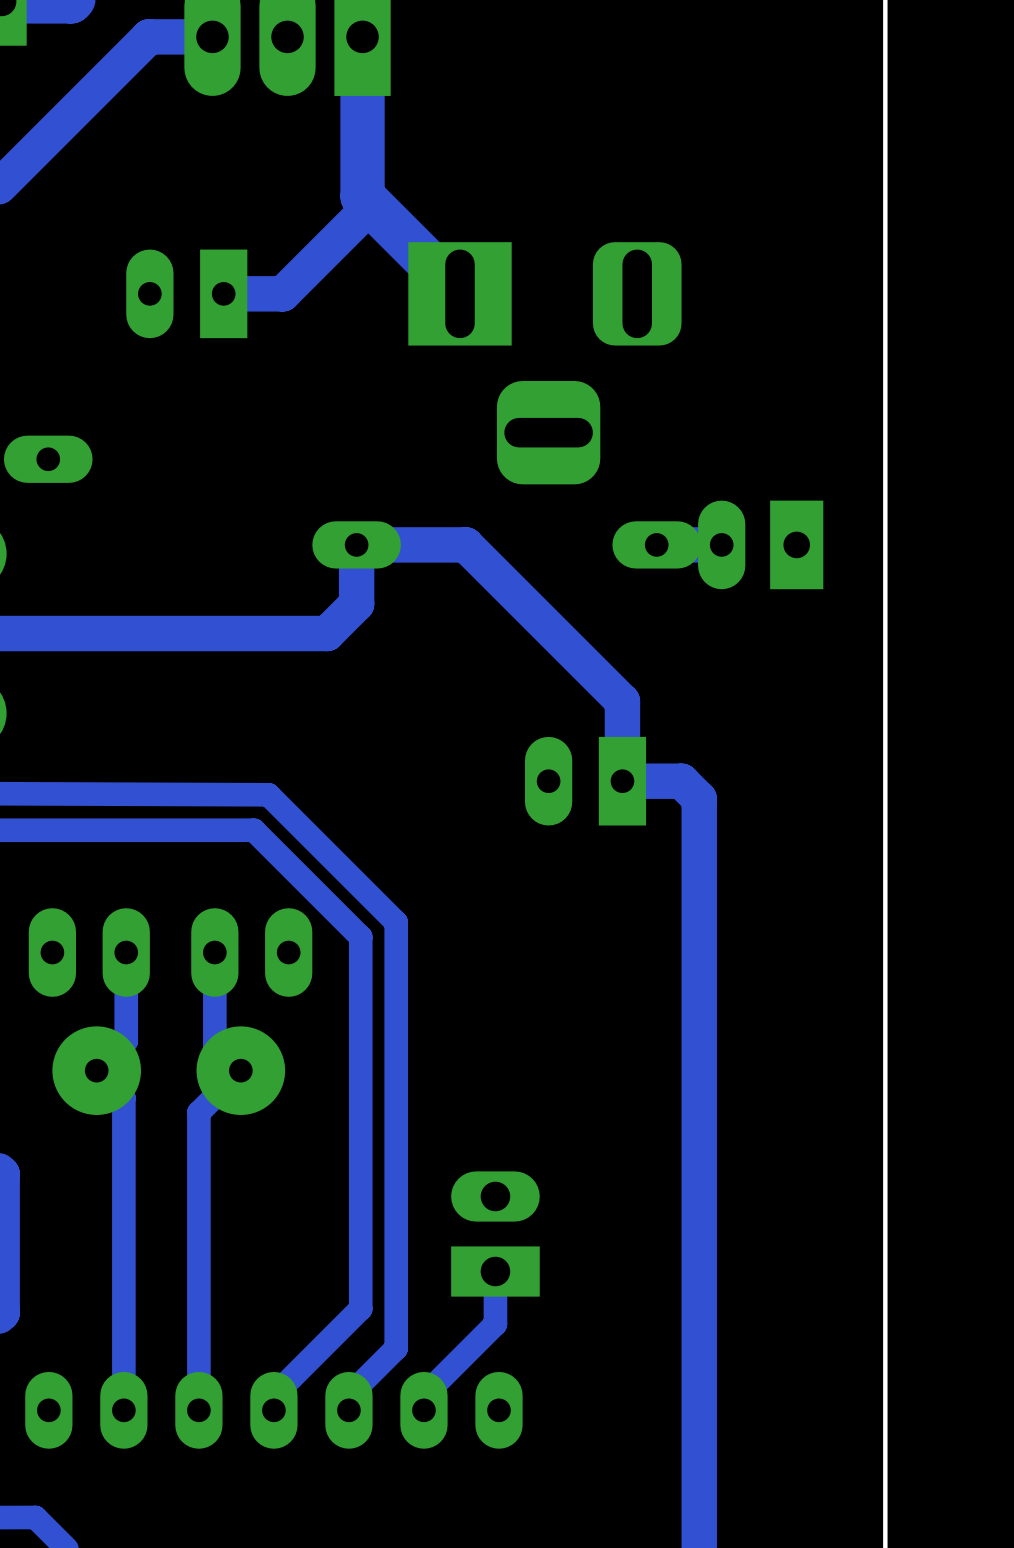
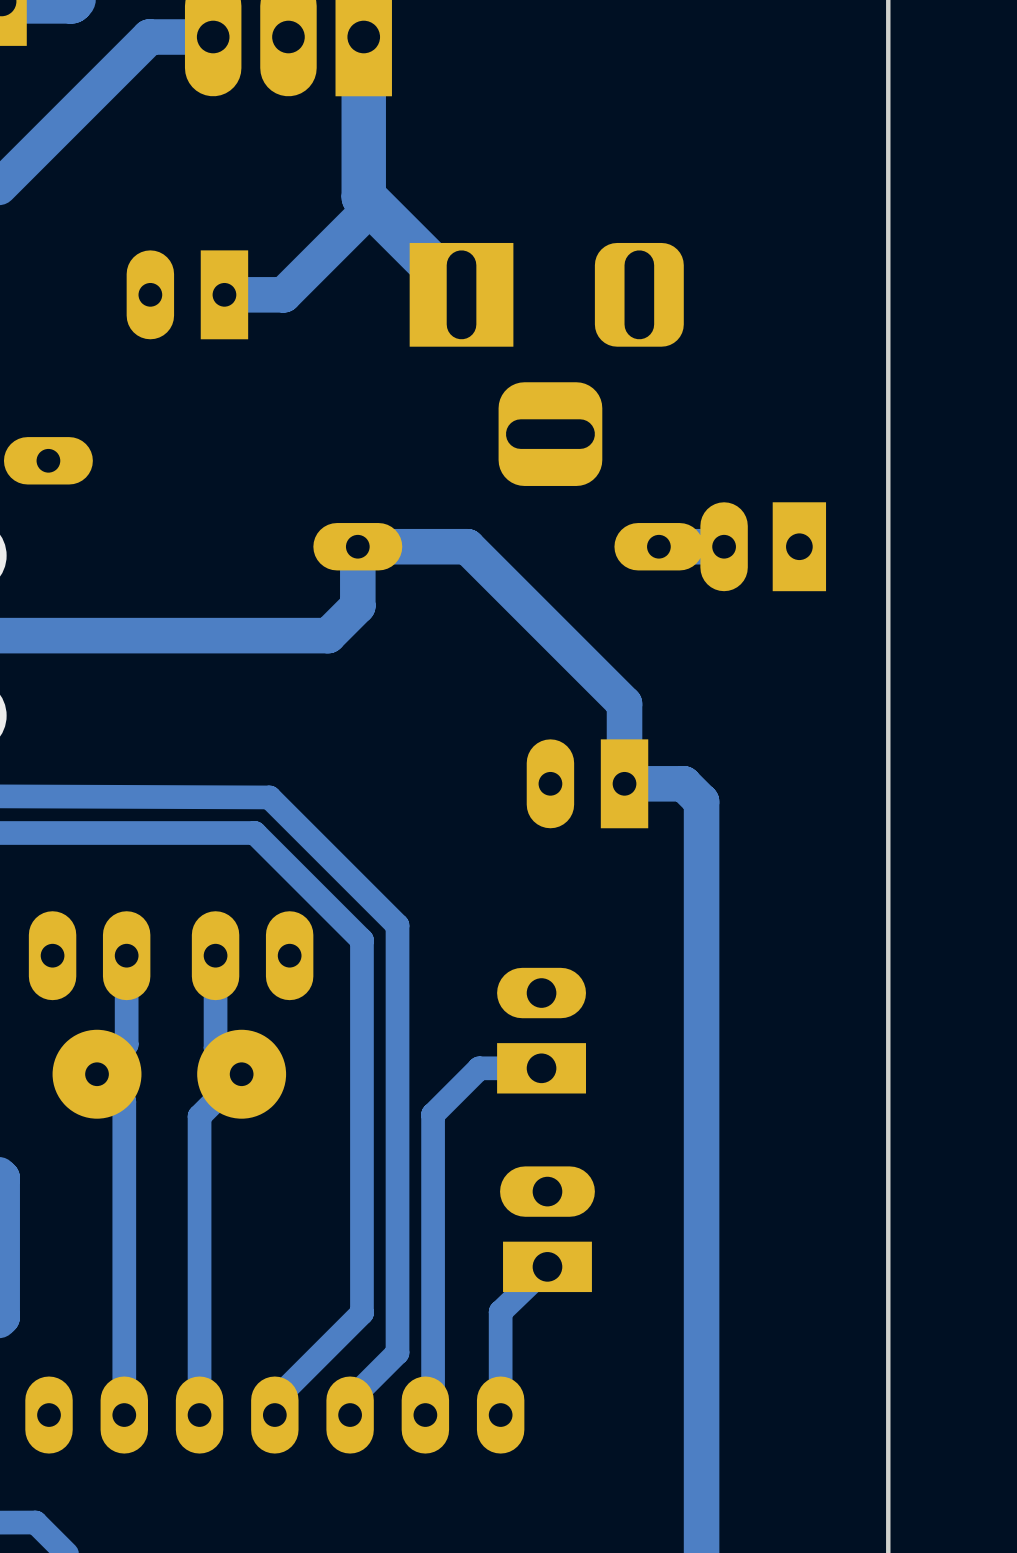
part: none -> (547, 1229)
part position: (495, 1234) -> (541, 1030)
bottom track: none -> (547, 1266) (500, 1311) (500, 1415)
bottom track: (495, 1271) (495, 1324) (423, 1395) (423, 1410) -> (541, 1068) (479, 1068) (433, 1114) (433, 1407) (425, 1415)

